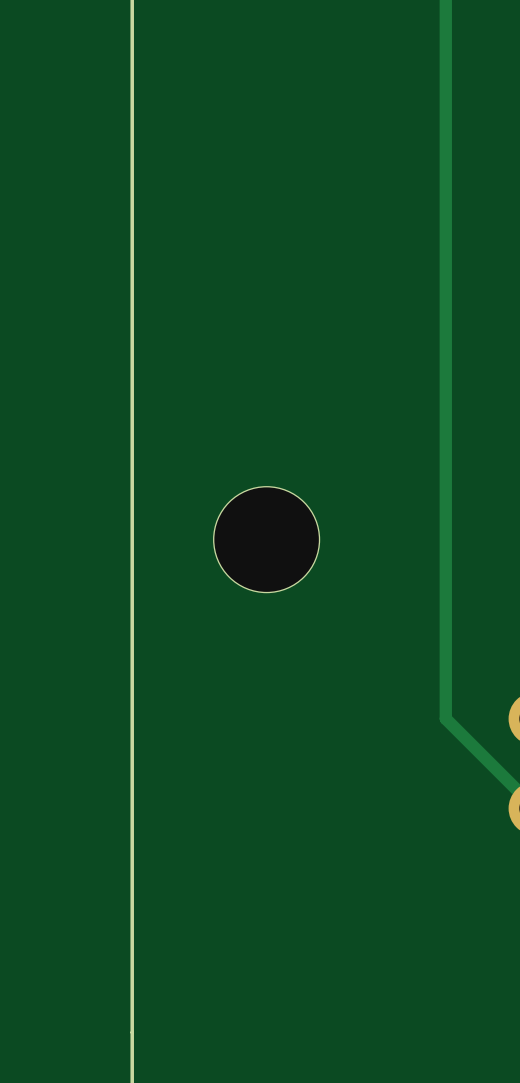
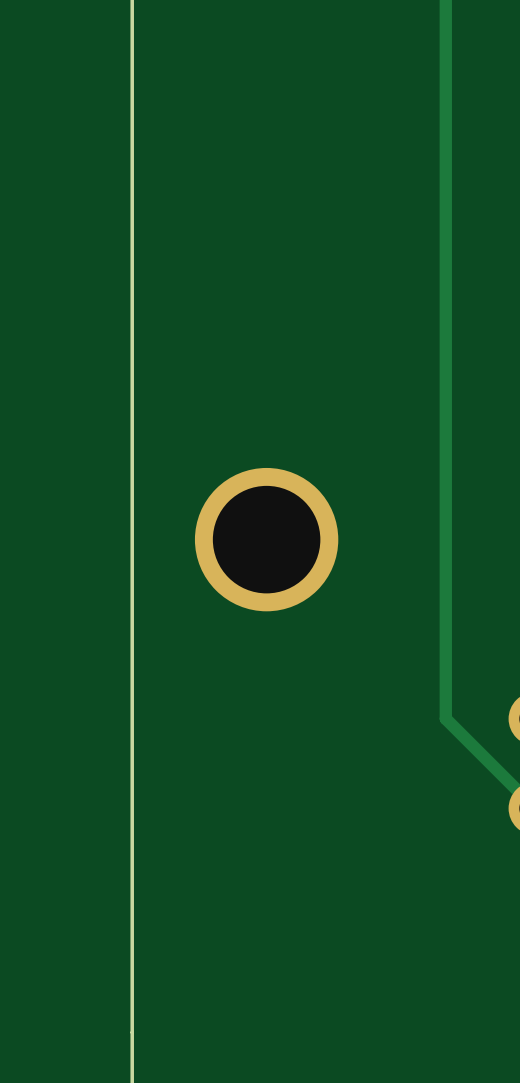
part footprint: [213, 486, 320, 593] -> [194, 467, 339, 612]

